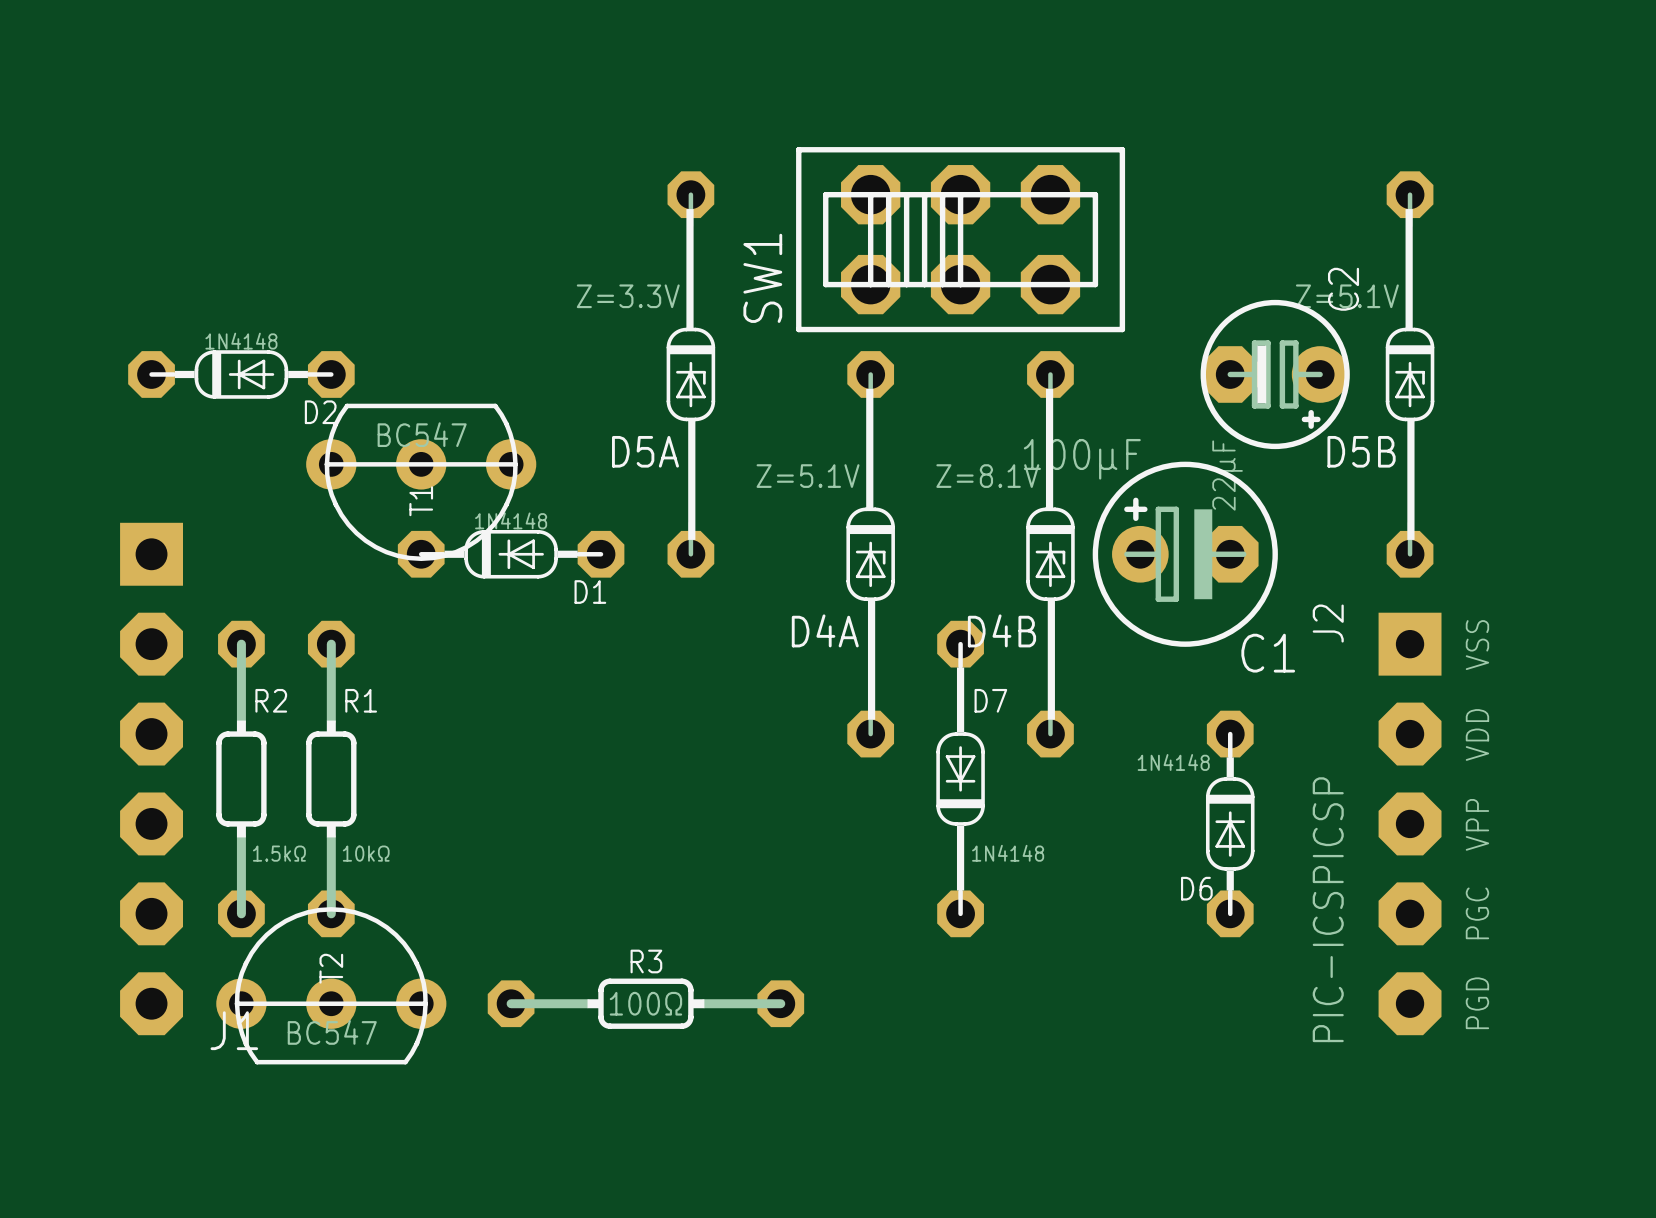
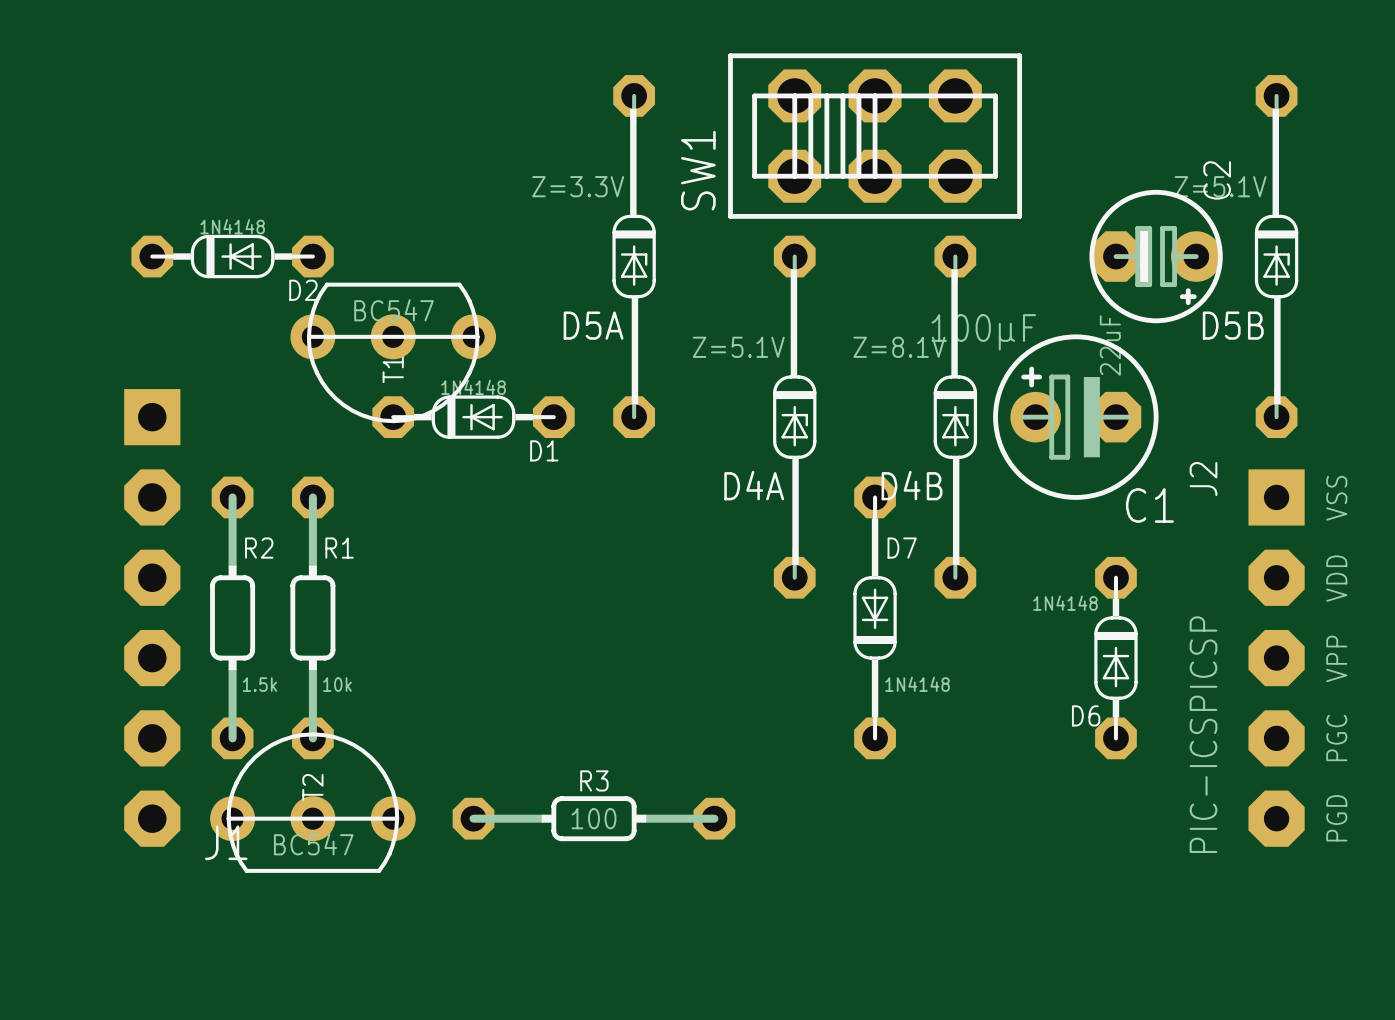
C2 value: 22μF (1227, 475) -> 22uF (1110, 345)
R2 value: 1.5kΩ (279, 853) -> 1.5k (259, 684)
R1 value: 10kΩ (366, 853) -> 10k (337, 684)
R3 value: 100Ω (645, 1003) -> 100 (593, 818)

